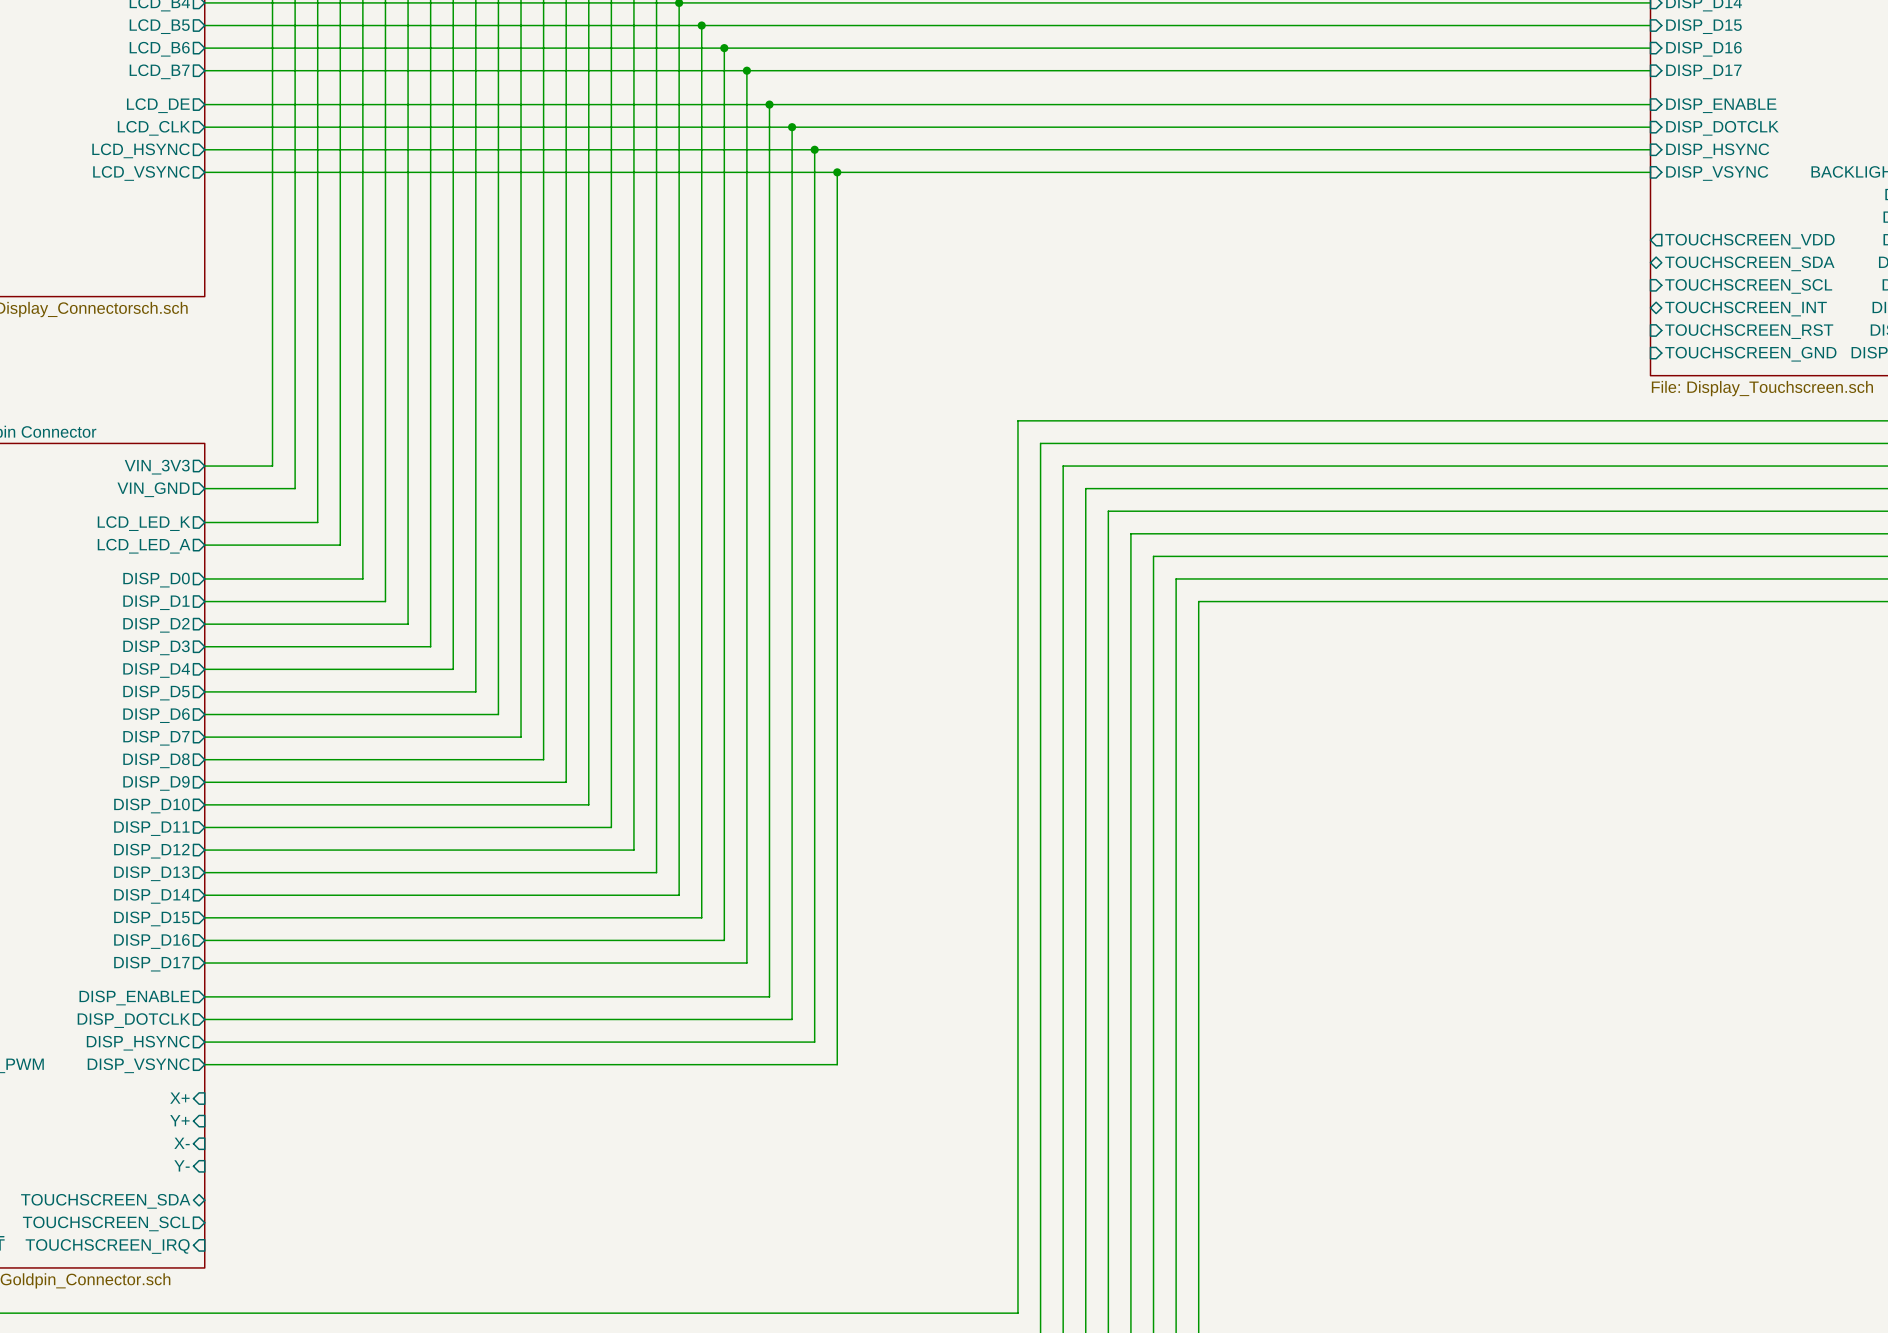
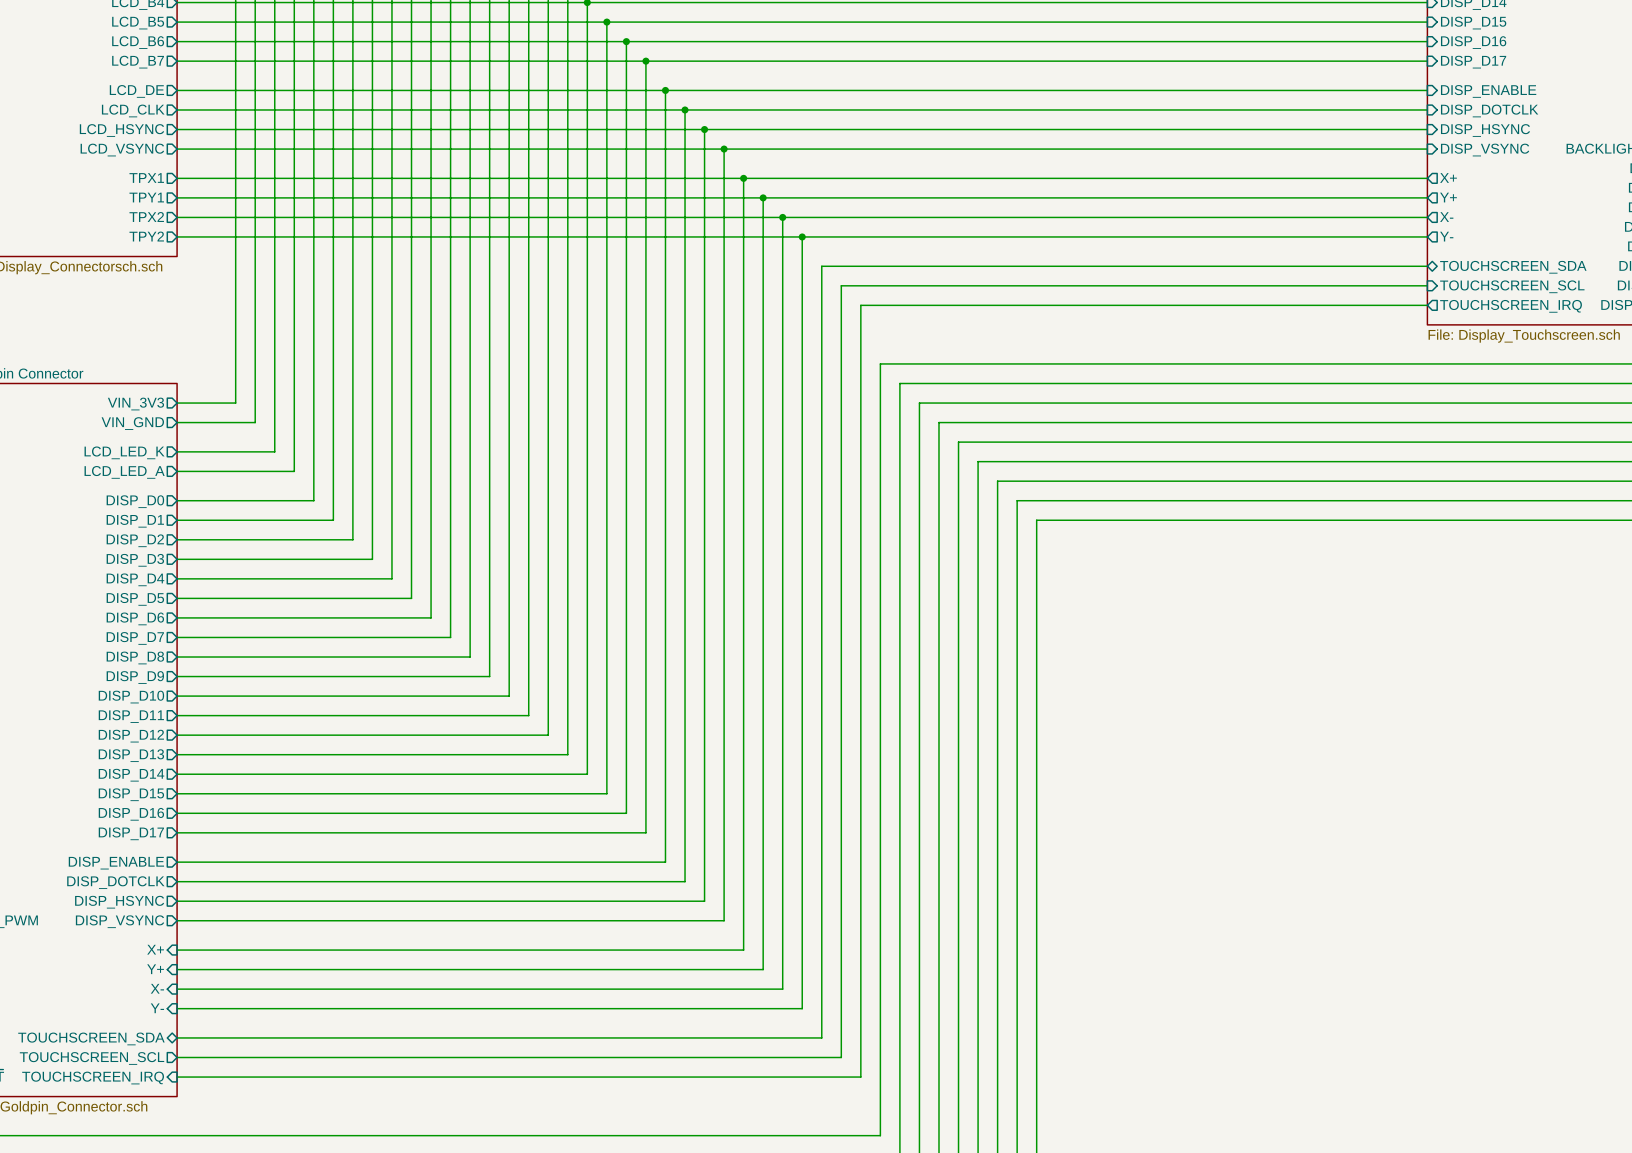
sheet pin: none -> TPX1 (146, 178)
sheet pin: none -> X+ (1448, 178)
wire: none -> (177, 178) (1427, 178)
wire: none -> (743, 178) (743, 950) (177, 950)
junction: none -> (743, 178)
sheet pin: none -> TPY1 (146, 197)
wire: none -> (177, 197) (1427, 197)
wire: none -> (763, 197) (763, 969) (177, 969)
junction: none -> (763, 197)
sheet pin: none -> Y+ (1448, 197)
sheet pin: TOUCHSCREEN_VDD (1749, 241) -> none
sheet pin: none -> TPX2 (146, 217)
wire: none -> (177, 217) (1427, 217)
wire: none -> (782, 217) (782, 989) (177, 989)
junction: none -> (782, 217)
sheet pin: none -> X- (1446, 217)
sheet pin: TOUCHSCREEN_SDA (1749, 263) -> none
sheet pin: none -> TPY2 (146, 236)
sheet pin: none -> Y- (1446, 236)
wire: none -> (177, 236) (1427, 236)
wire: none -> (802, 236) (802, 1008) (177, 1008)
junction: none -> (802, 236)
sheet pin: TOUCHSCREEN_SCL (1748, 286) -> none
wire: none -> (1427, 266) (821, 266) (821, 1037) (177, 1037)
sheet pin: TOUCHSCREEN_INT (1746, 309) -> TOUCHSCREEN_SDA (1513, 267)
wire: none -> (1427, 285) (841, 285) (841, 1057) (177, 1057)
sheet pin: TOUCHSCREEN_RST (1749, 331) -> TOUCHSCREEN_SCL (1512, 286)
wire: none -> (1427, 305) (860, 305) (860, 1077) (177, 1077)
sheet pin shape: input (1750, 354) -> output (1511, 306)
sheet pin: TOUCHSCREEN_GND (1750, 354) -> TOUCHSCREEN_IRQ (1511, 306)

